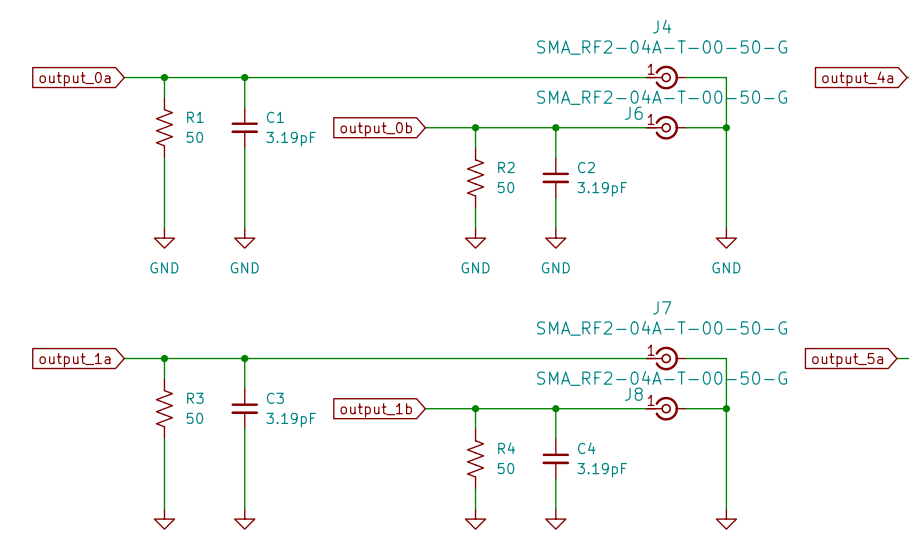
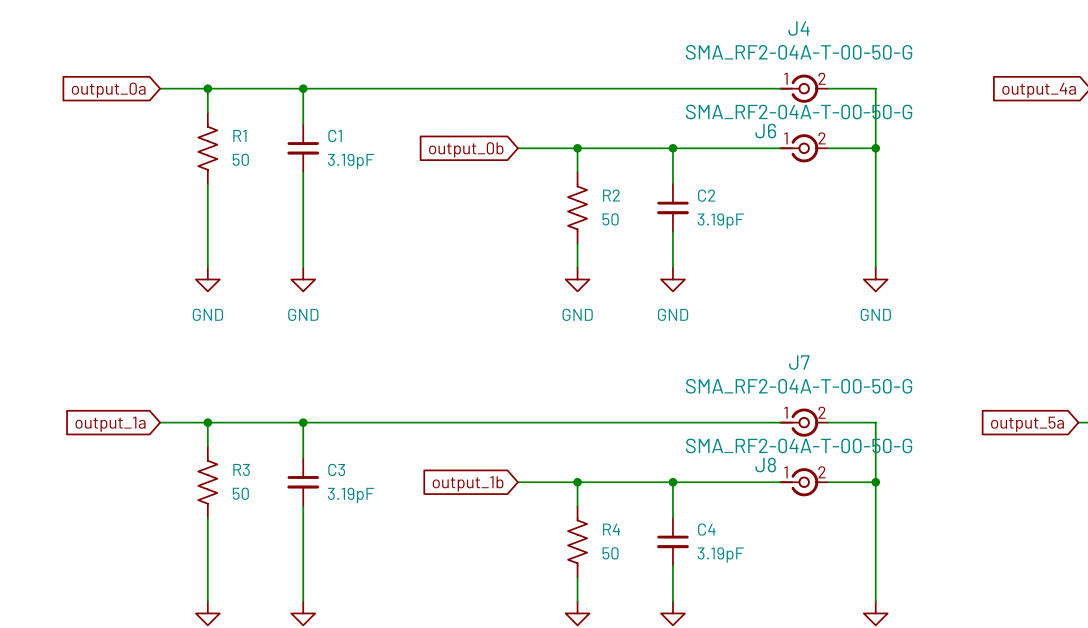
J4 pin number: none -> 2 (822, 78)
J6 pin number: none -> 2 (822, 138)
J7 pin number: none -> 2 (822, 412)
J8 pin number: none -> 2 (822, 472)

